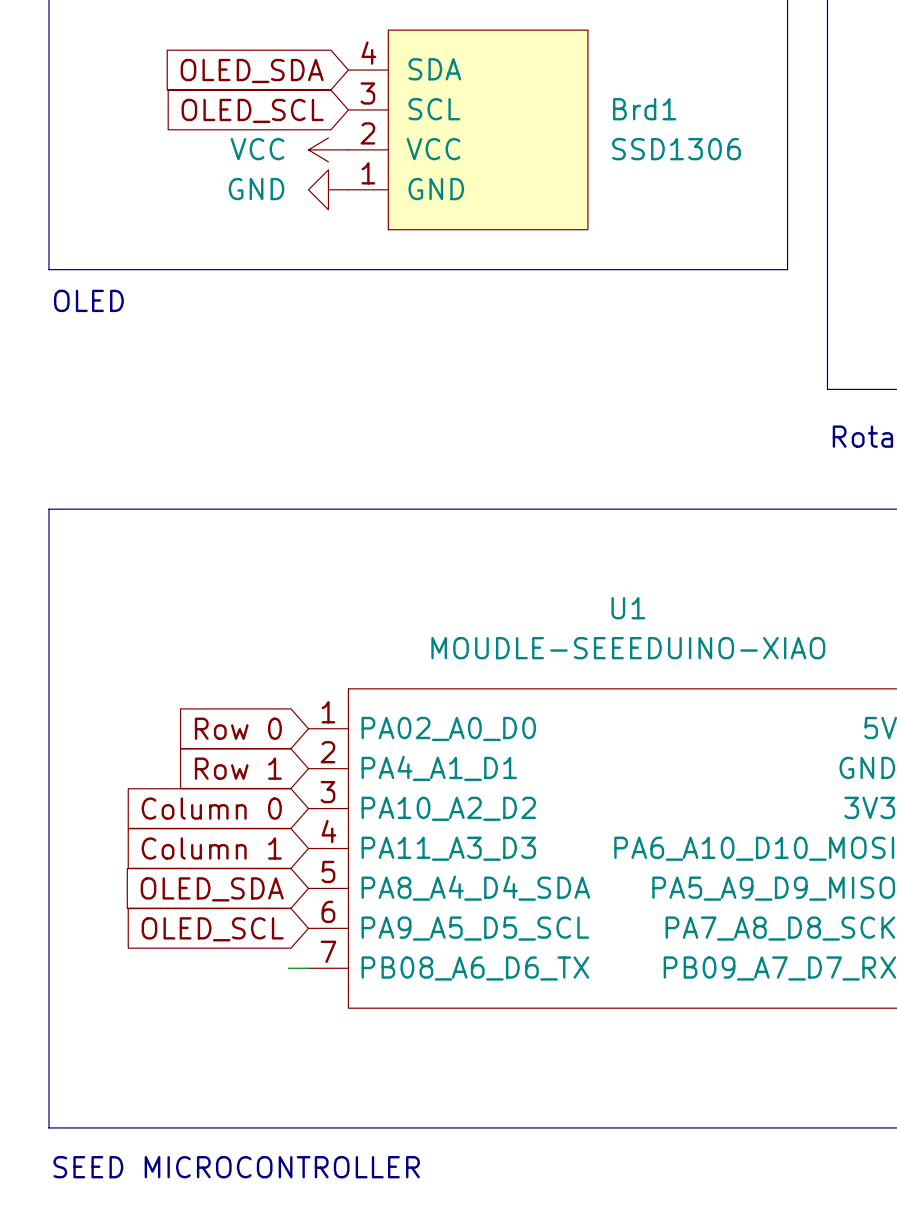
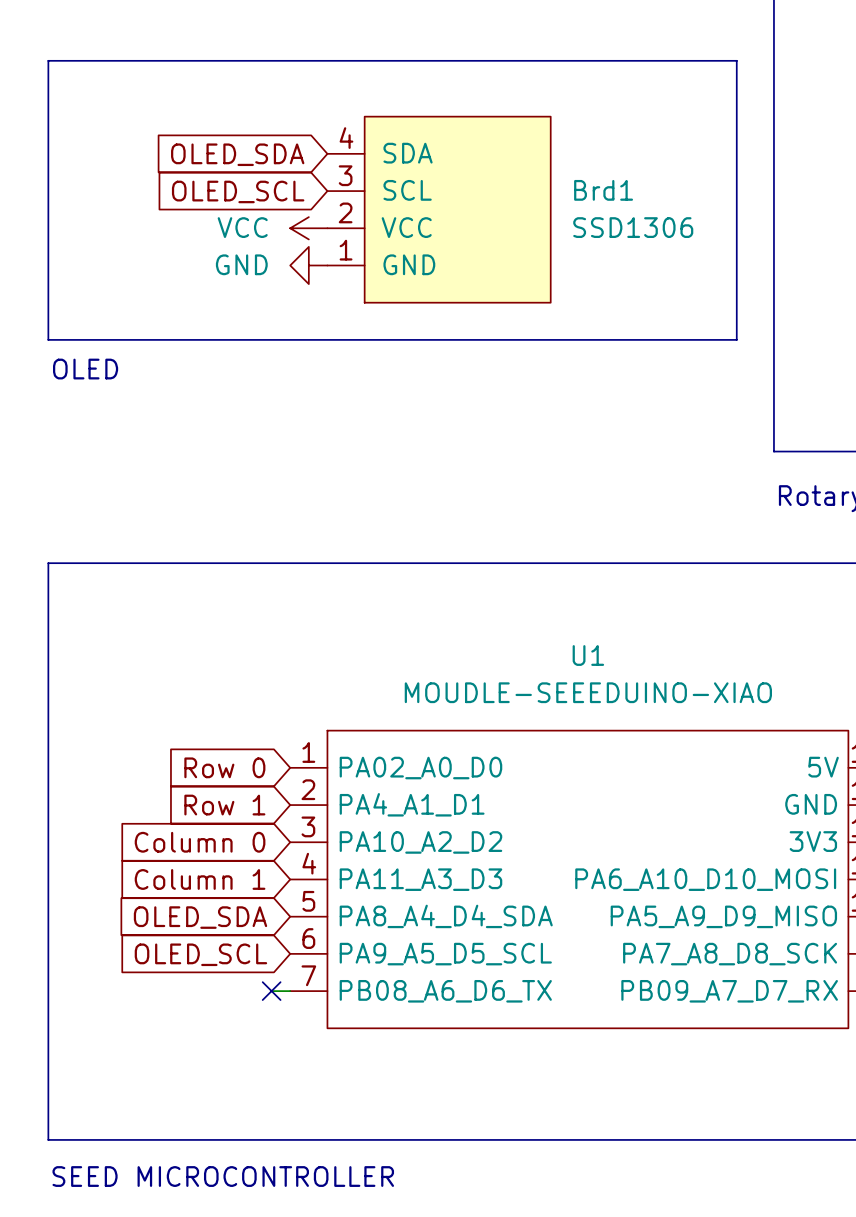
no-connect mark: none -> (271, 991)

